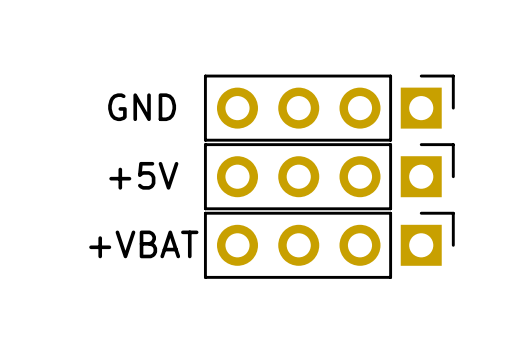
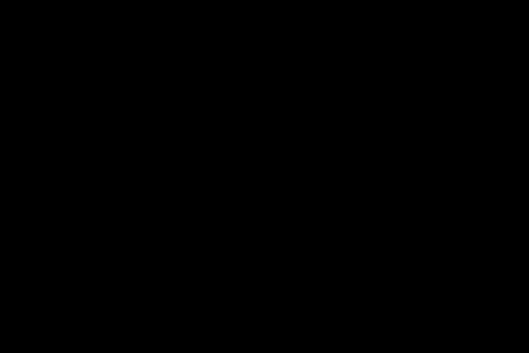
part: GND (329, 108) -> none
part: +5V (329, 176) -> none
part: +VBAT (329, 245) -> none

